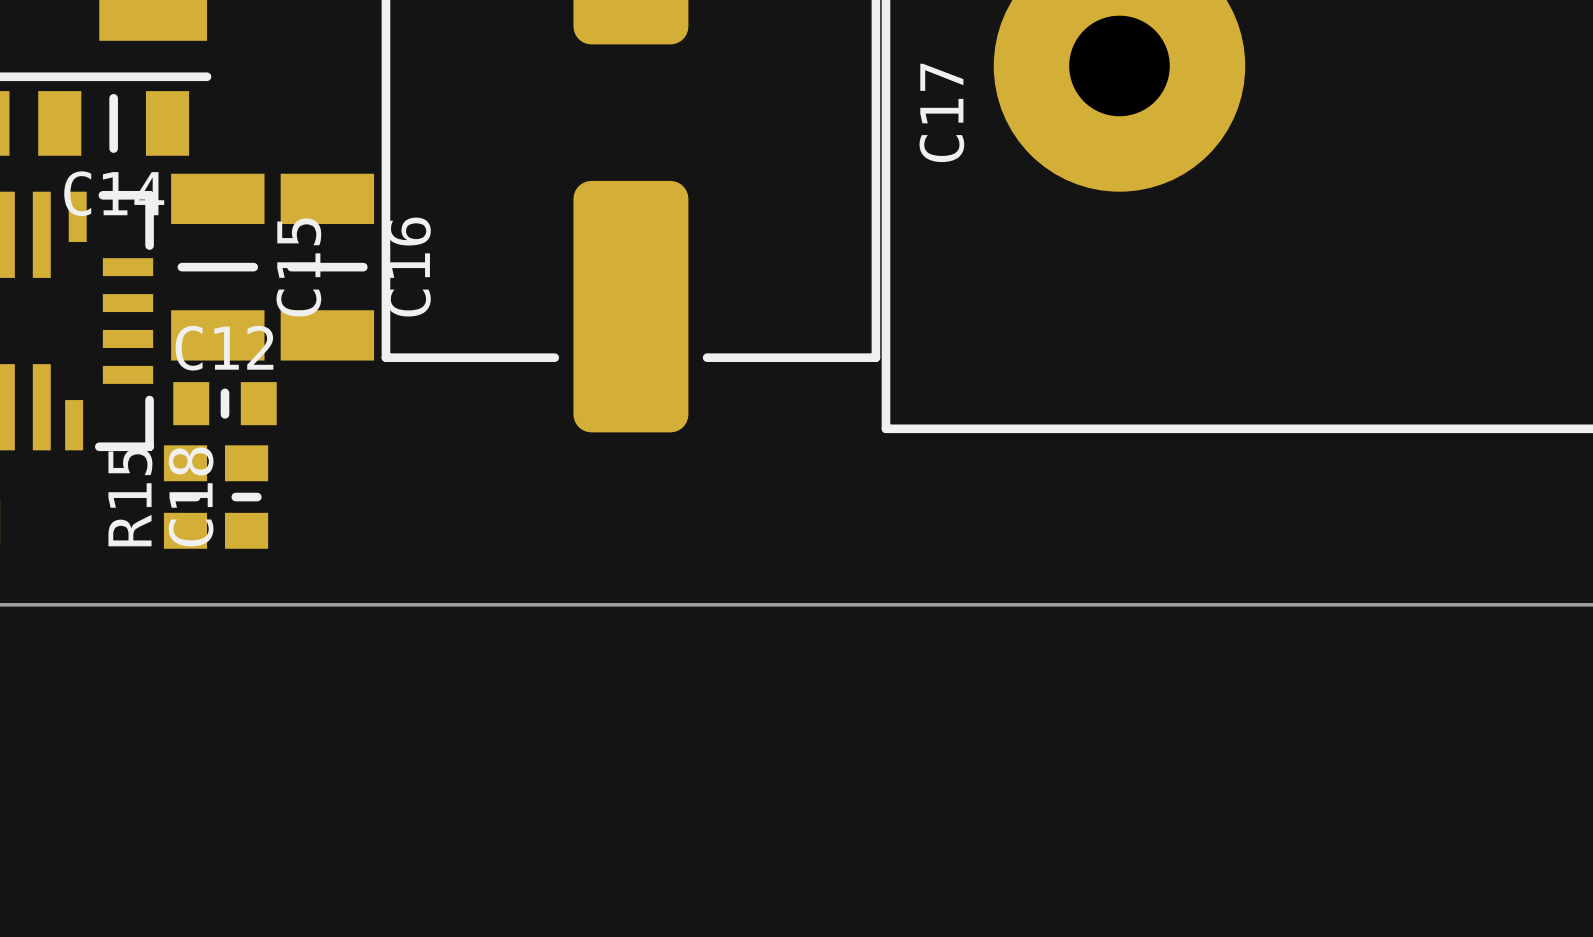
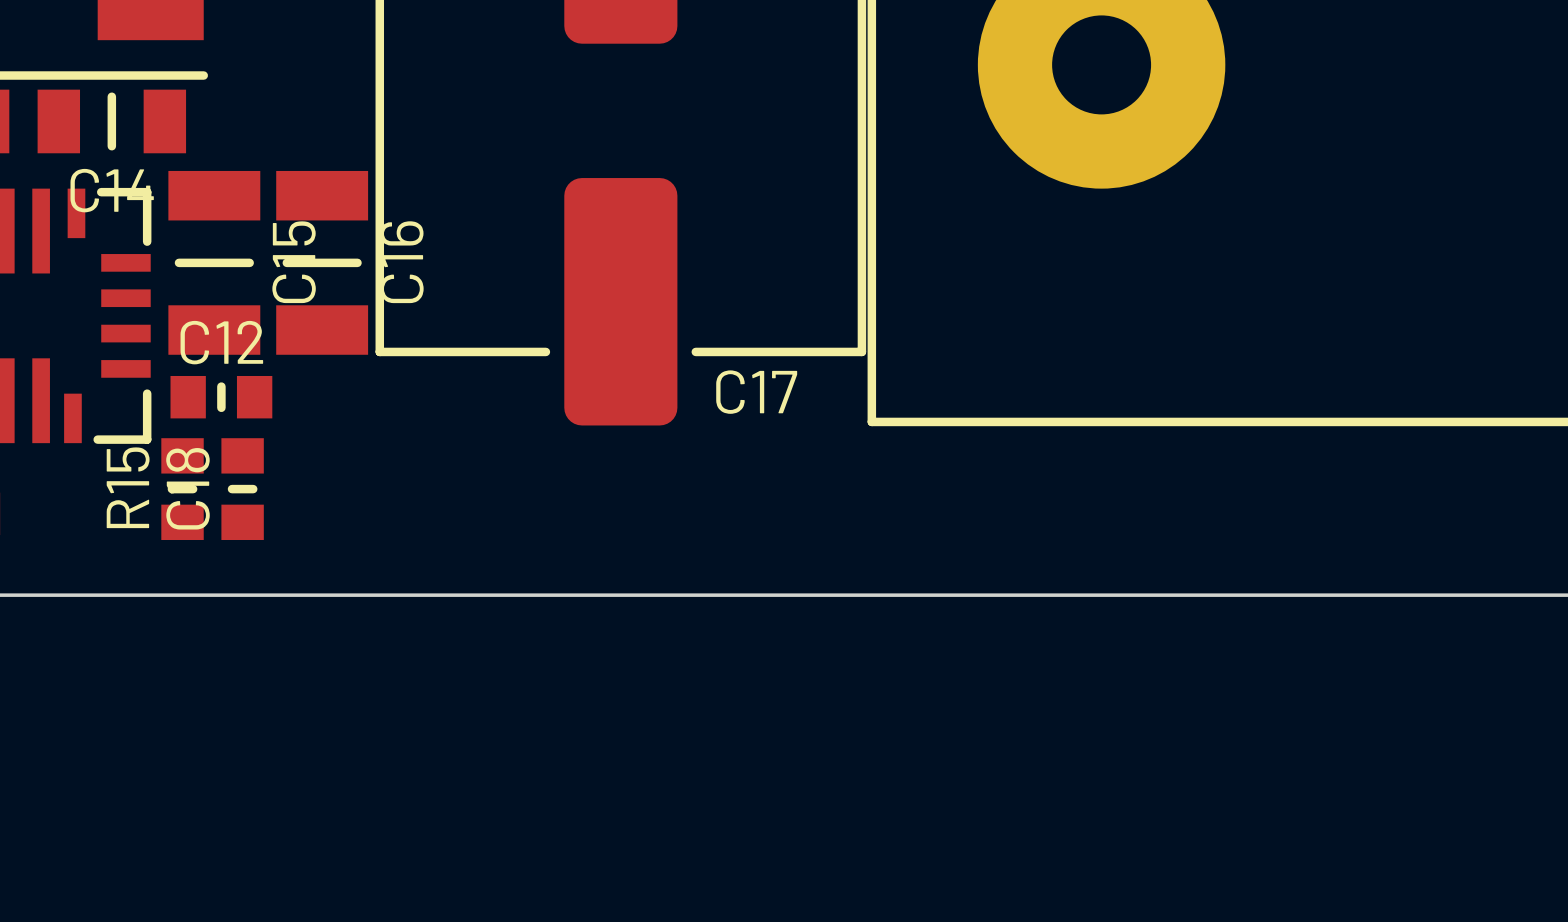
C17 name rotation: 0° (941, 112) -> 90° clockwise (756, 392)
C17 name position: C17 (941, 112) -> C17 (756, 392)

